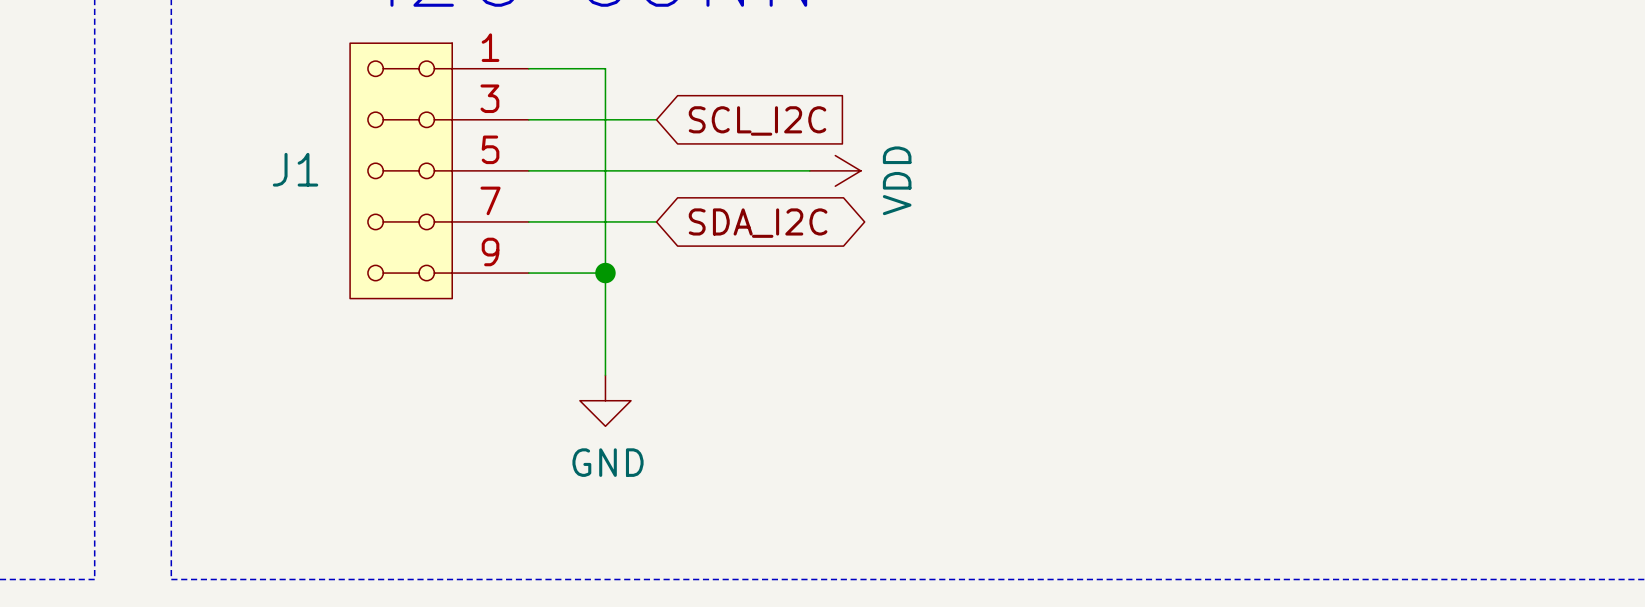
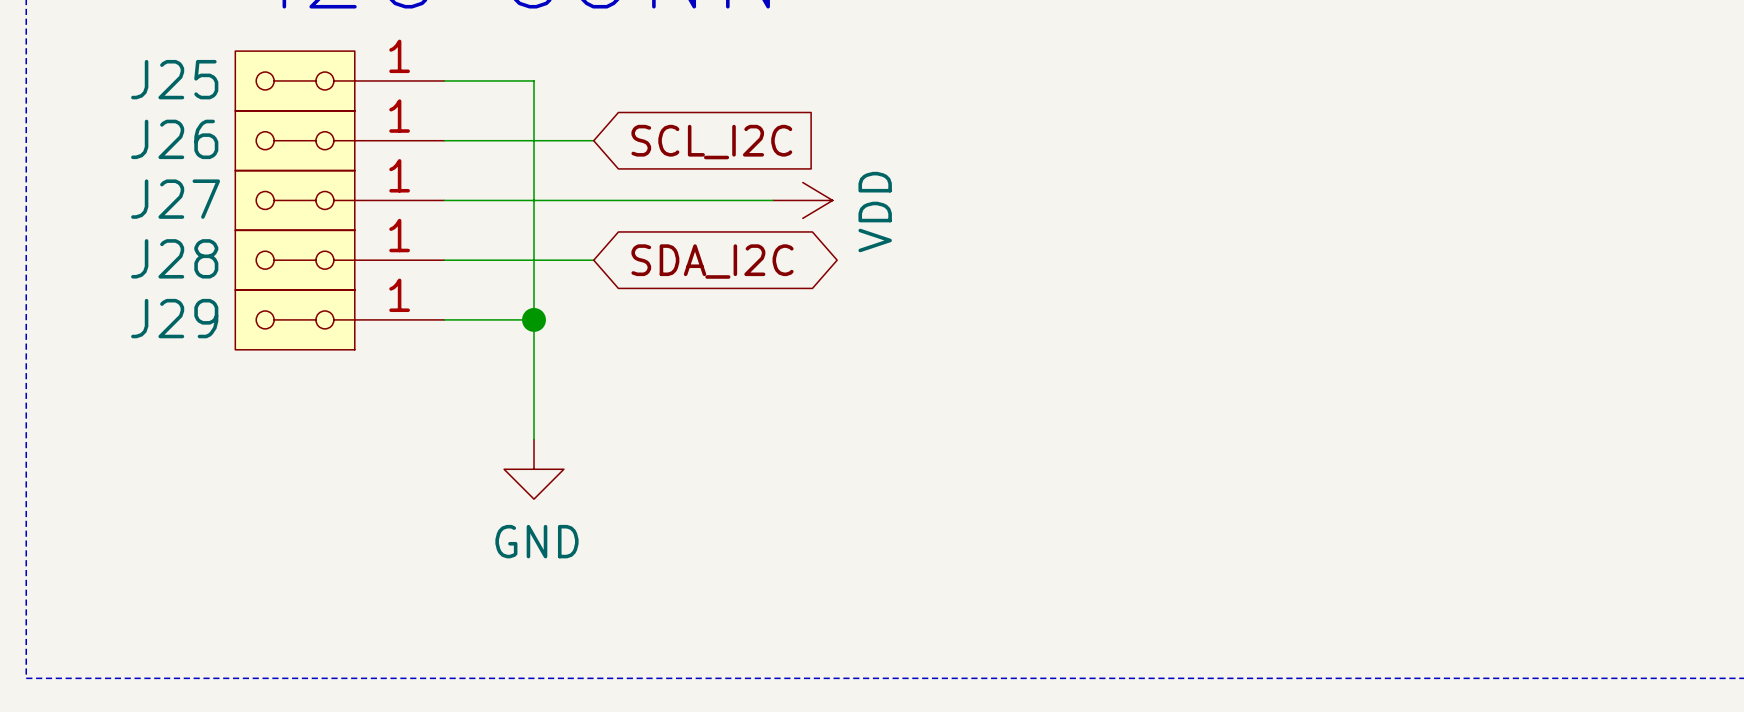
J25: none -> (339, 80)
J26: none -> (339, 140)
J1: (439, 170) -> none
J27: none -> (339, 200)
J28: none -> (339, 260)
J29: none -> (339, 319)

